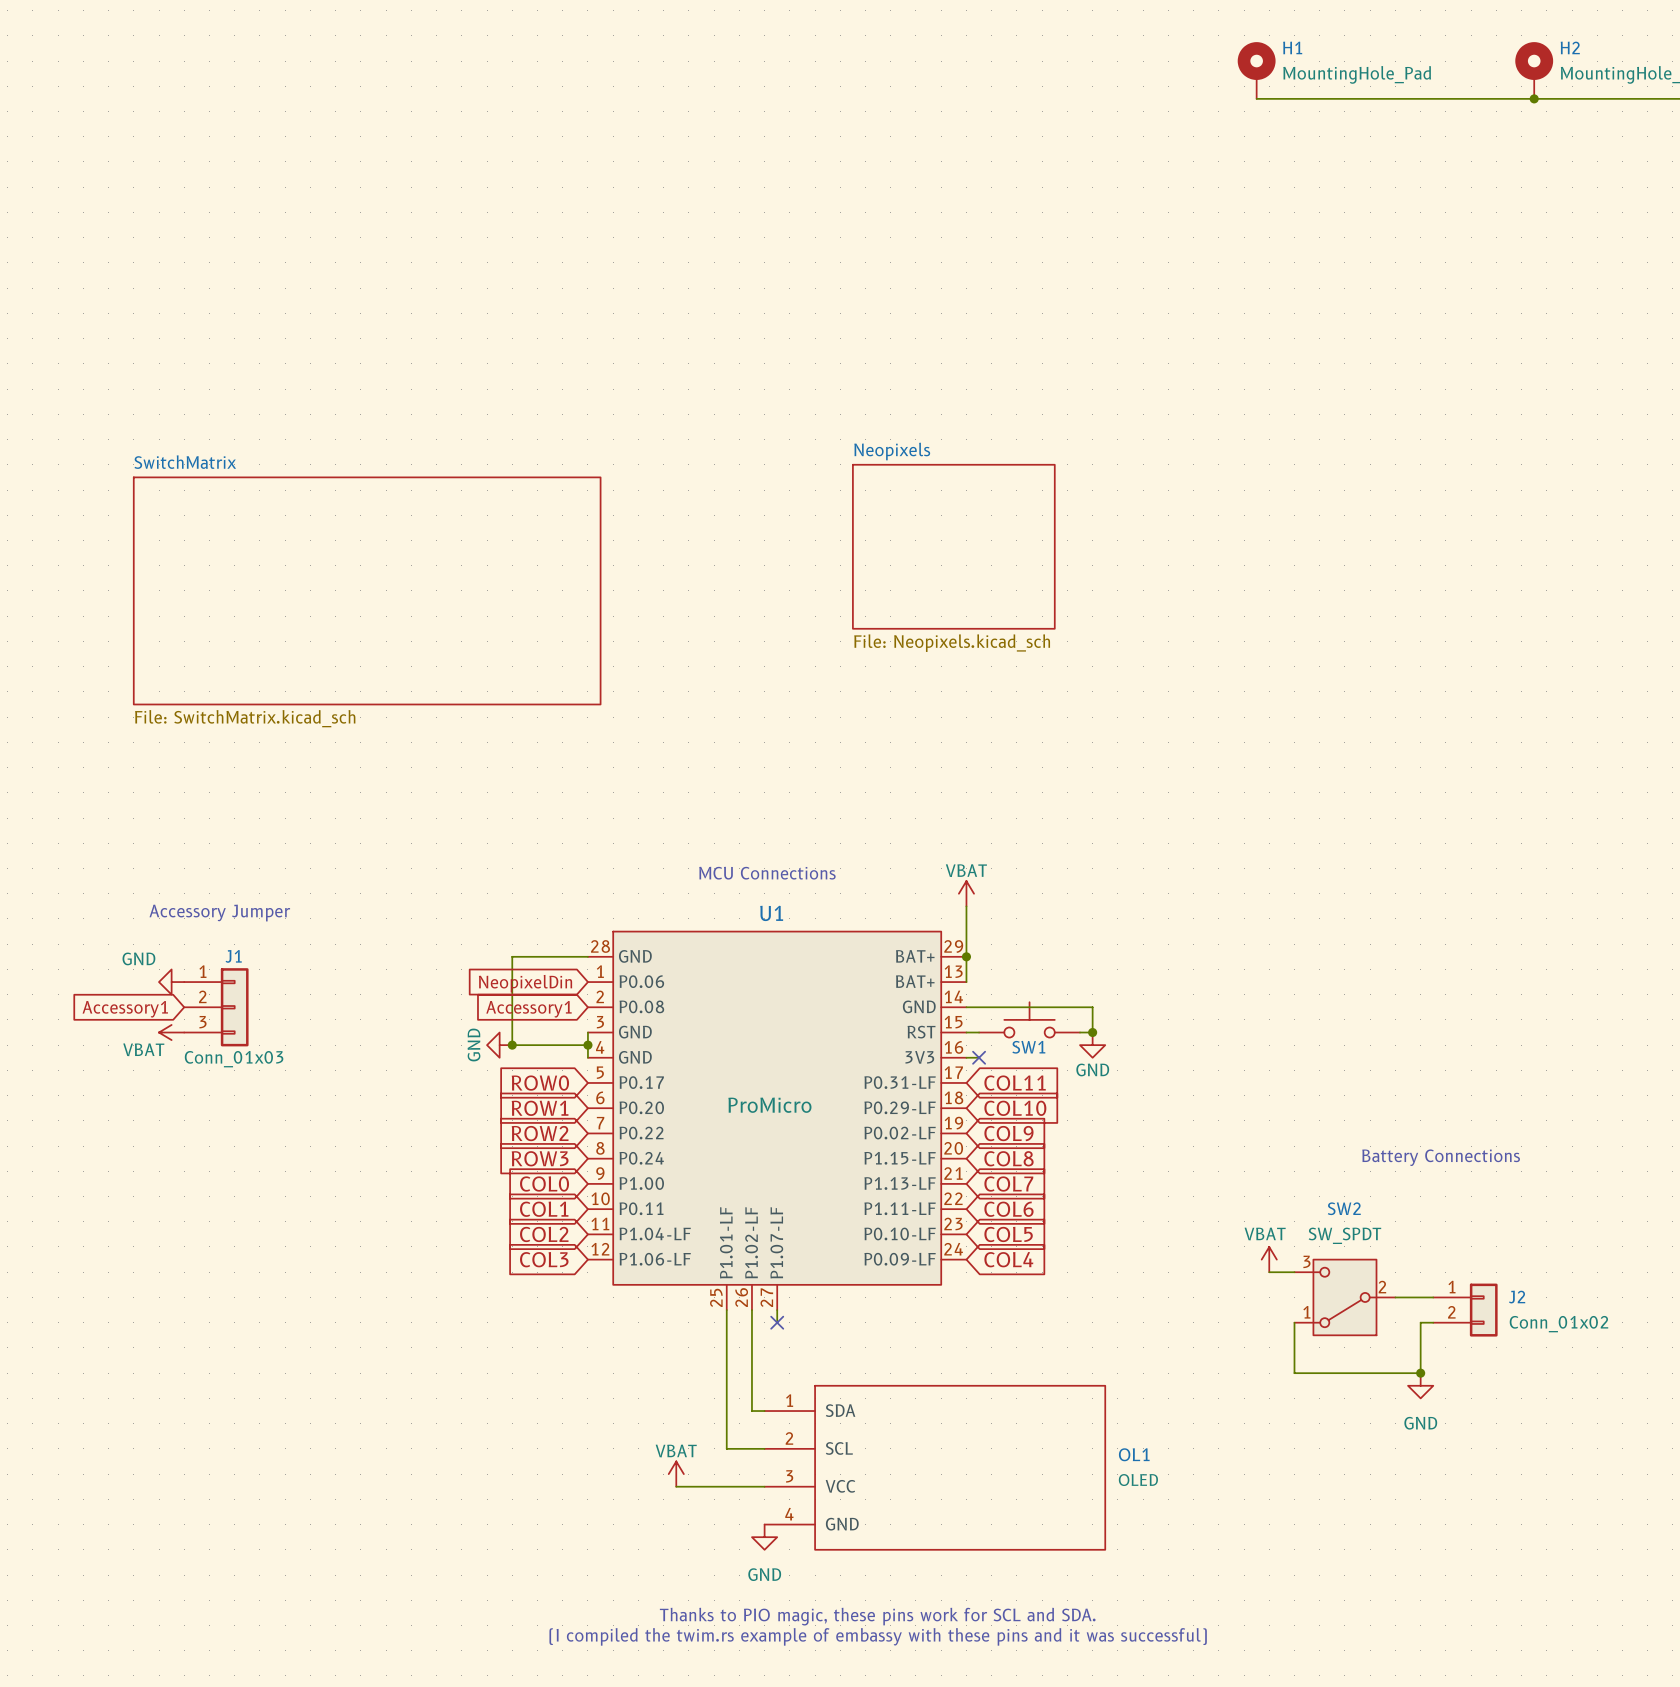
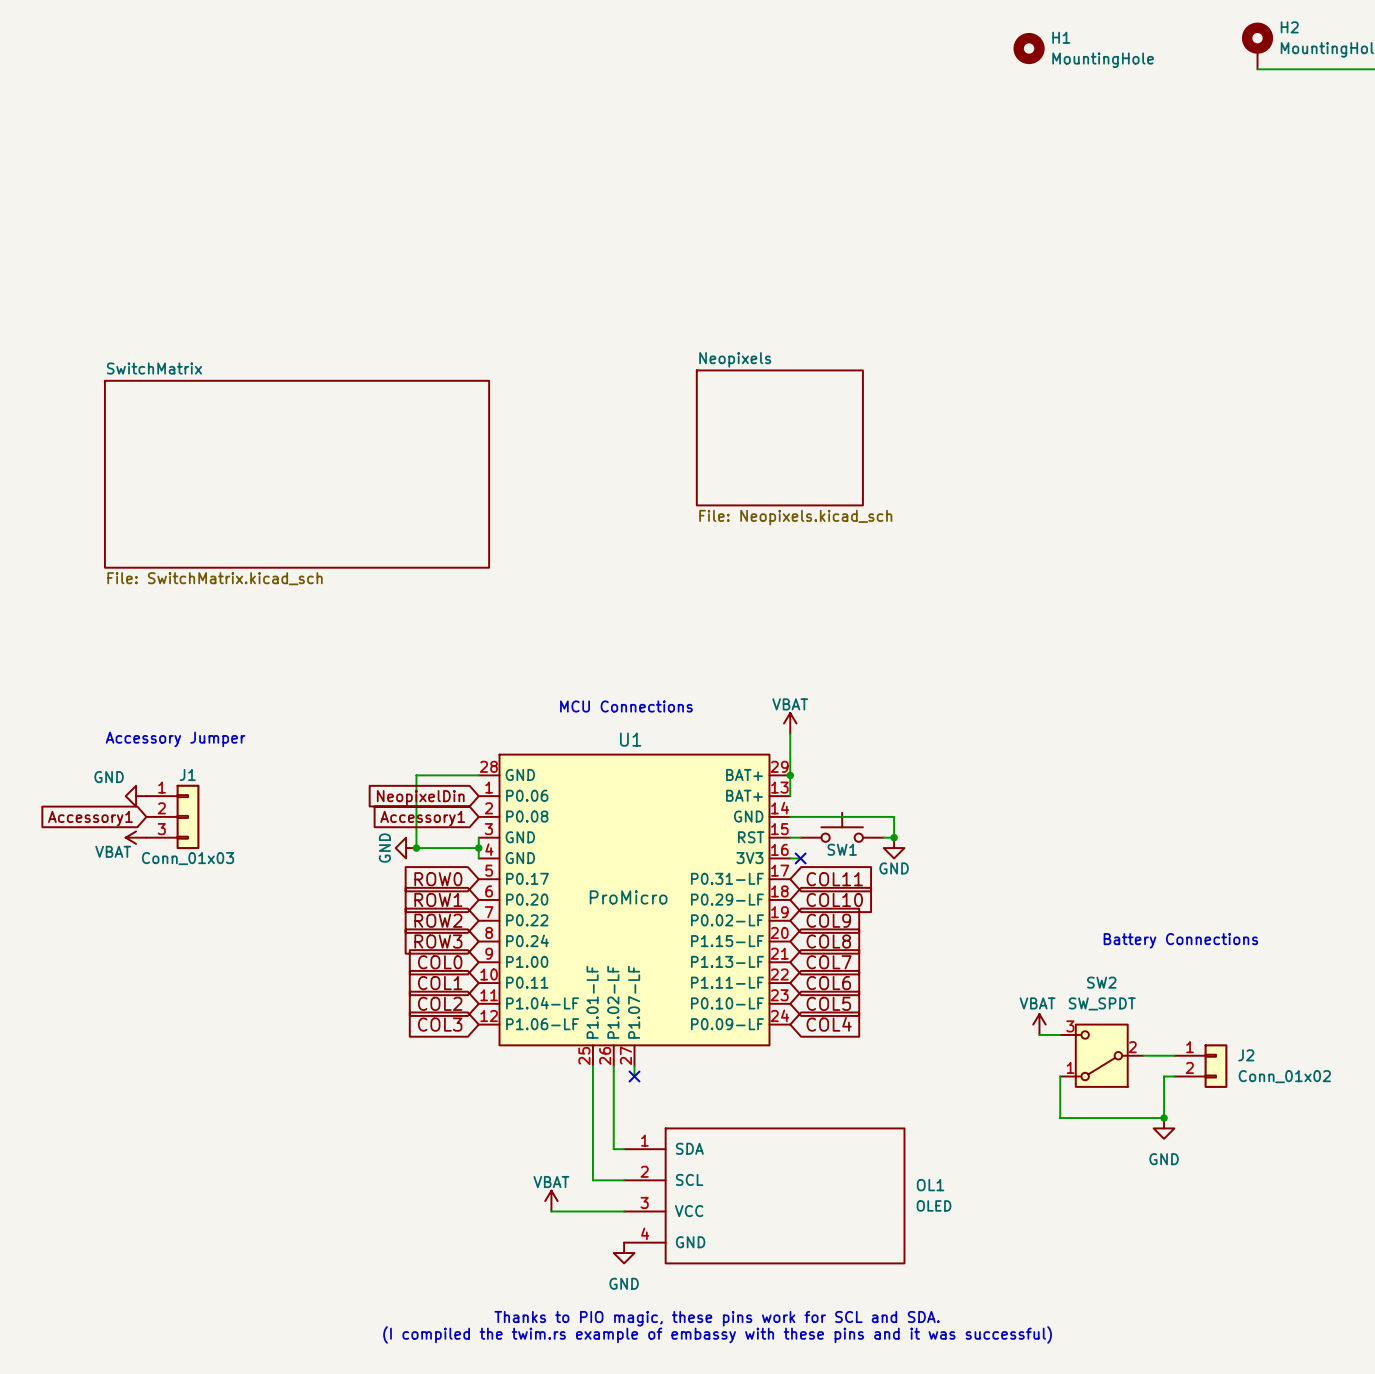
H1 symbol: [1237, 42, 1276, 99] -> [1013, 32, 1045, 65]
H1 value: MountingHole_Pad (1357, 74) -> MountingHole (1103, 60)
wire: (1256, 98) (1534, 98) -> none
junction: (1534, 98) -> none

